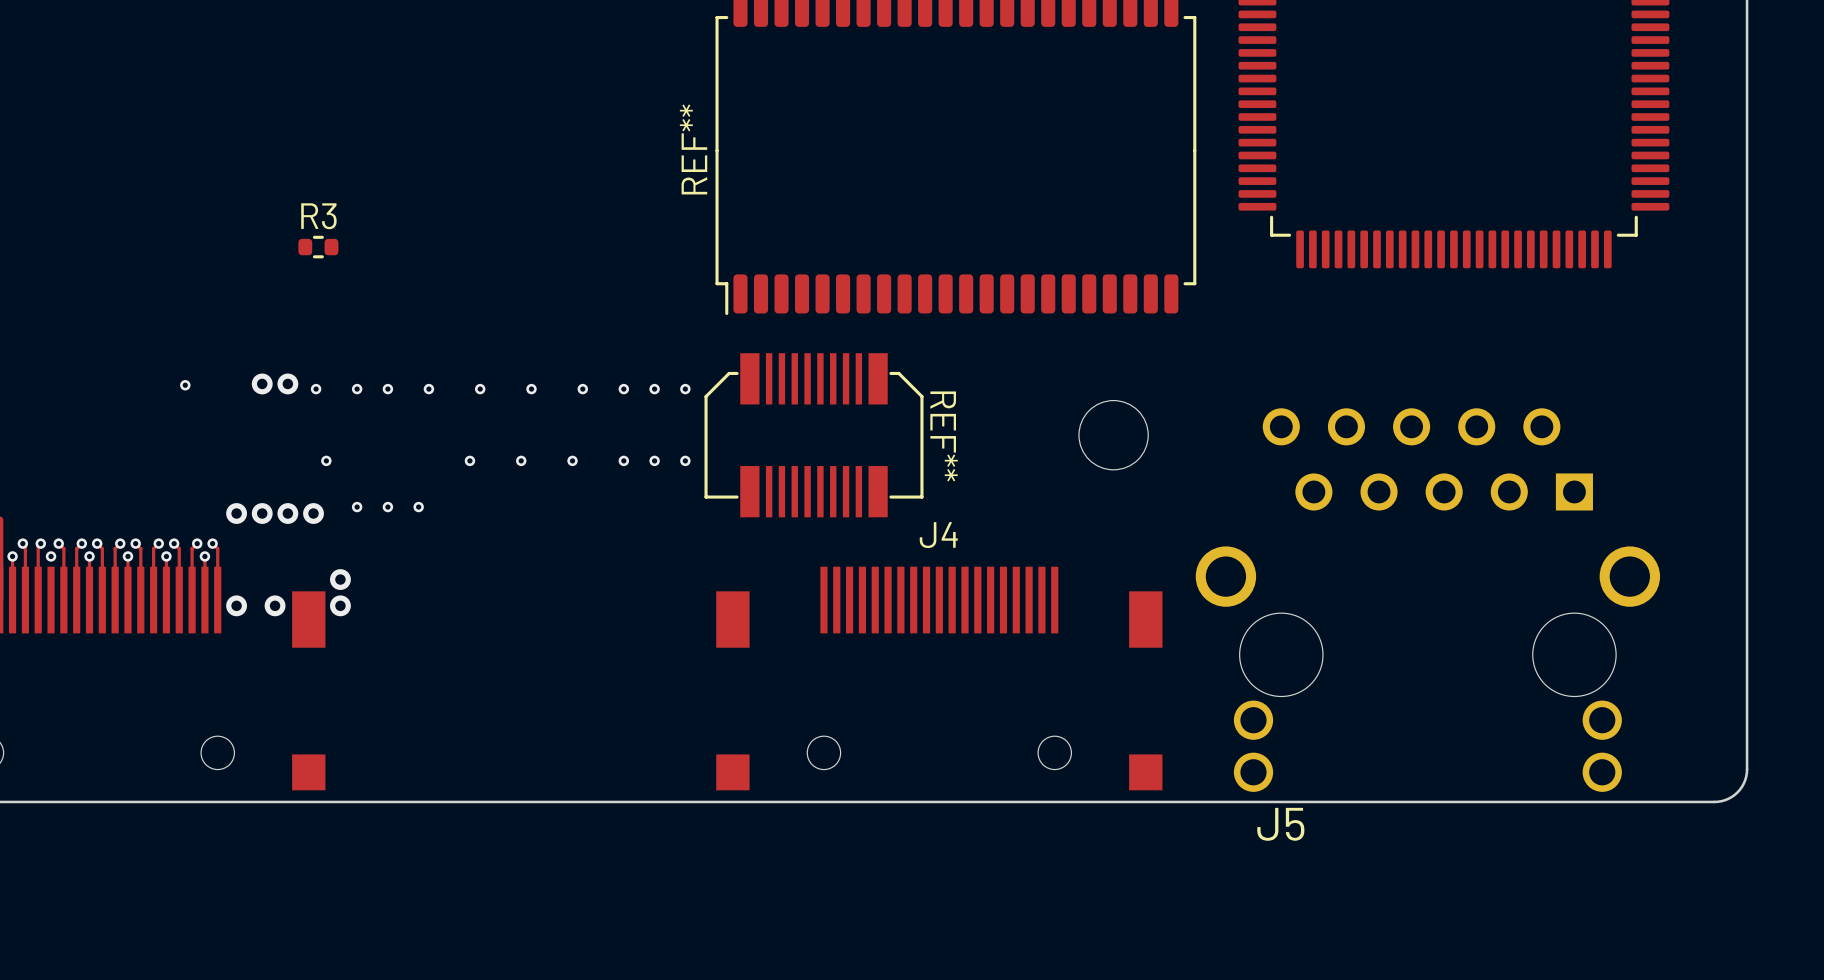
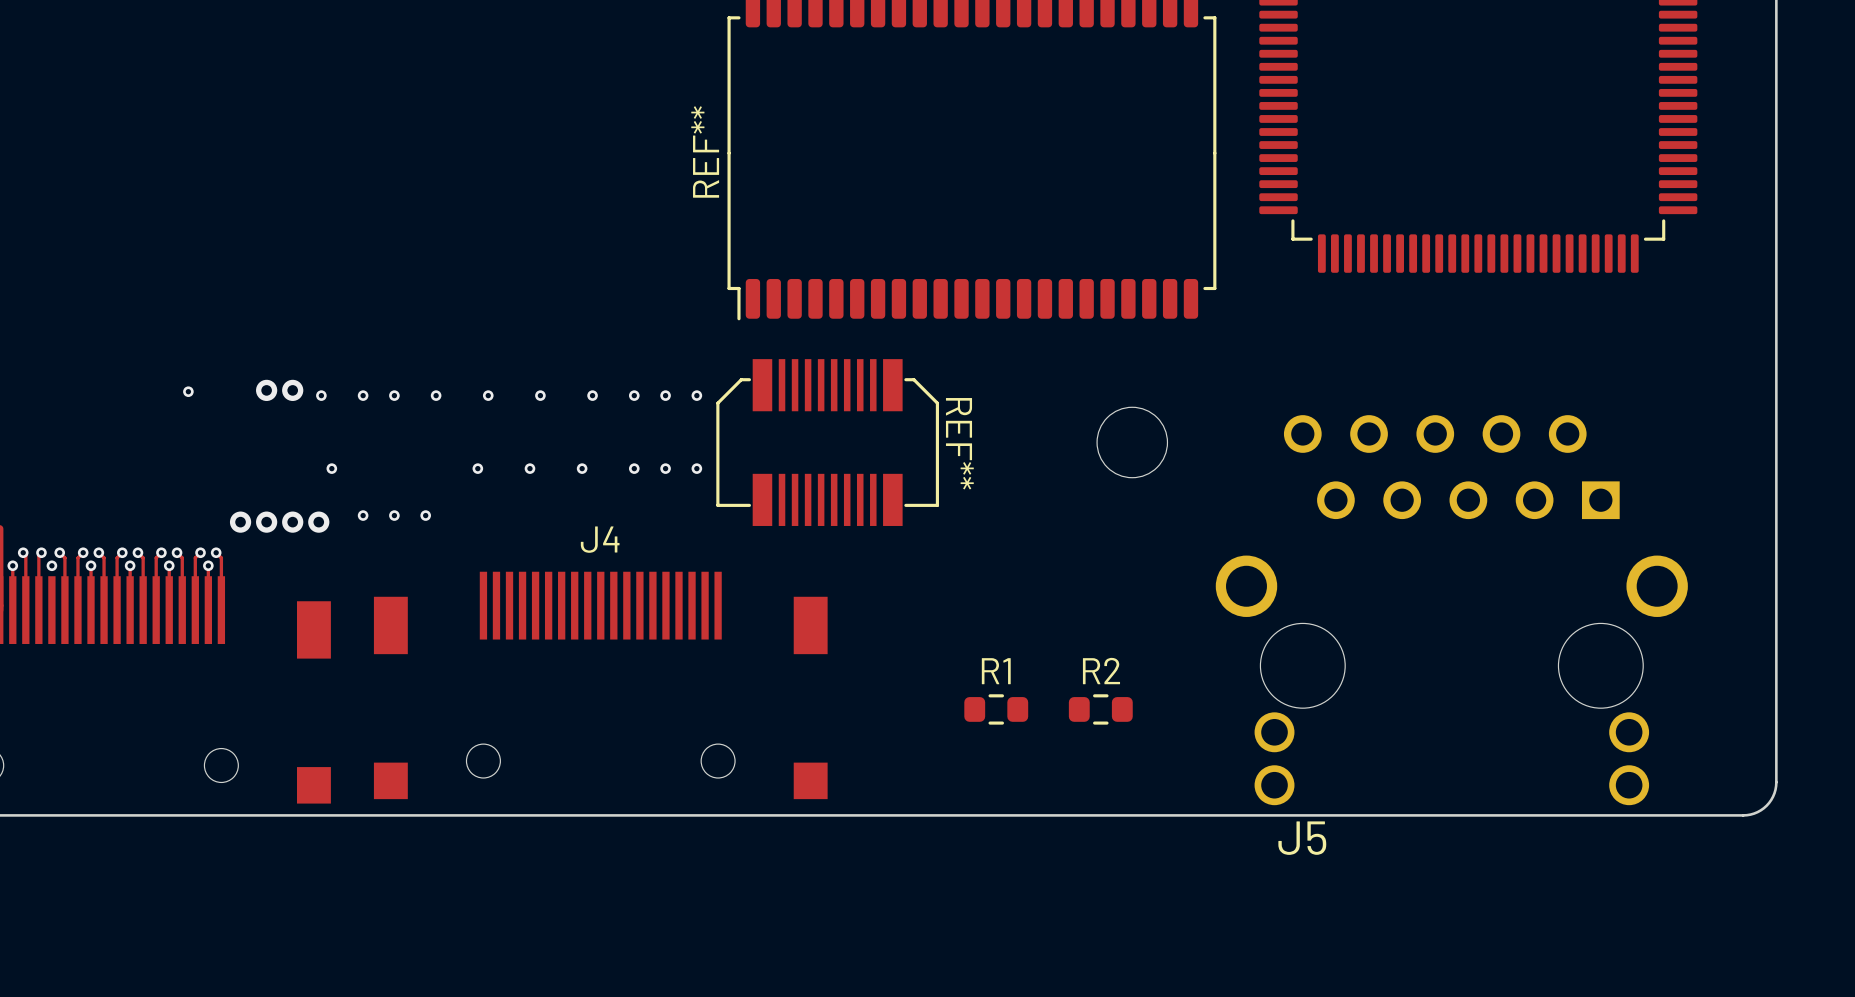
R3: (318, 247) -> none
via: (340, 579) -> none
via: (236, 605) -> none
via: (275, 605) -> none
via: (340, 605) -> none
J4 position: (939, 678) -> (600, 685)
R1: none -> (996, 709)
R2: none -> (1100, 709)

